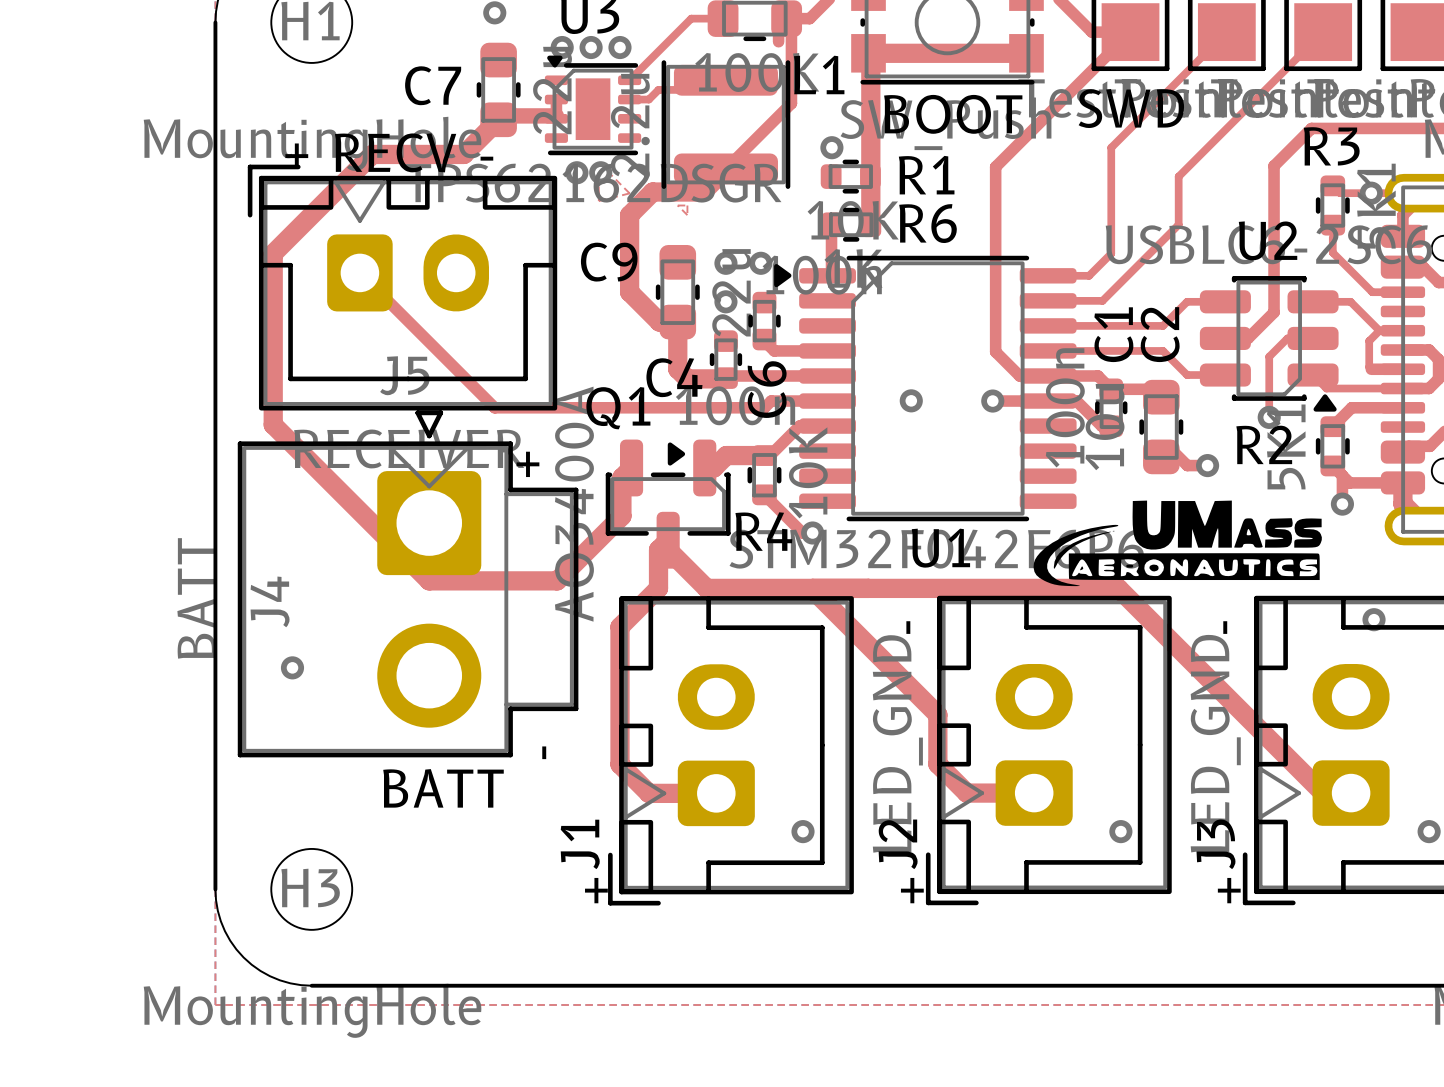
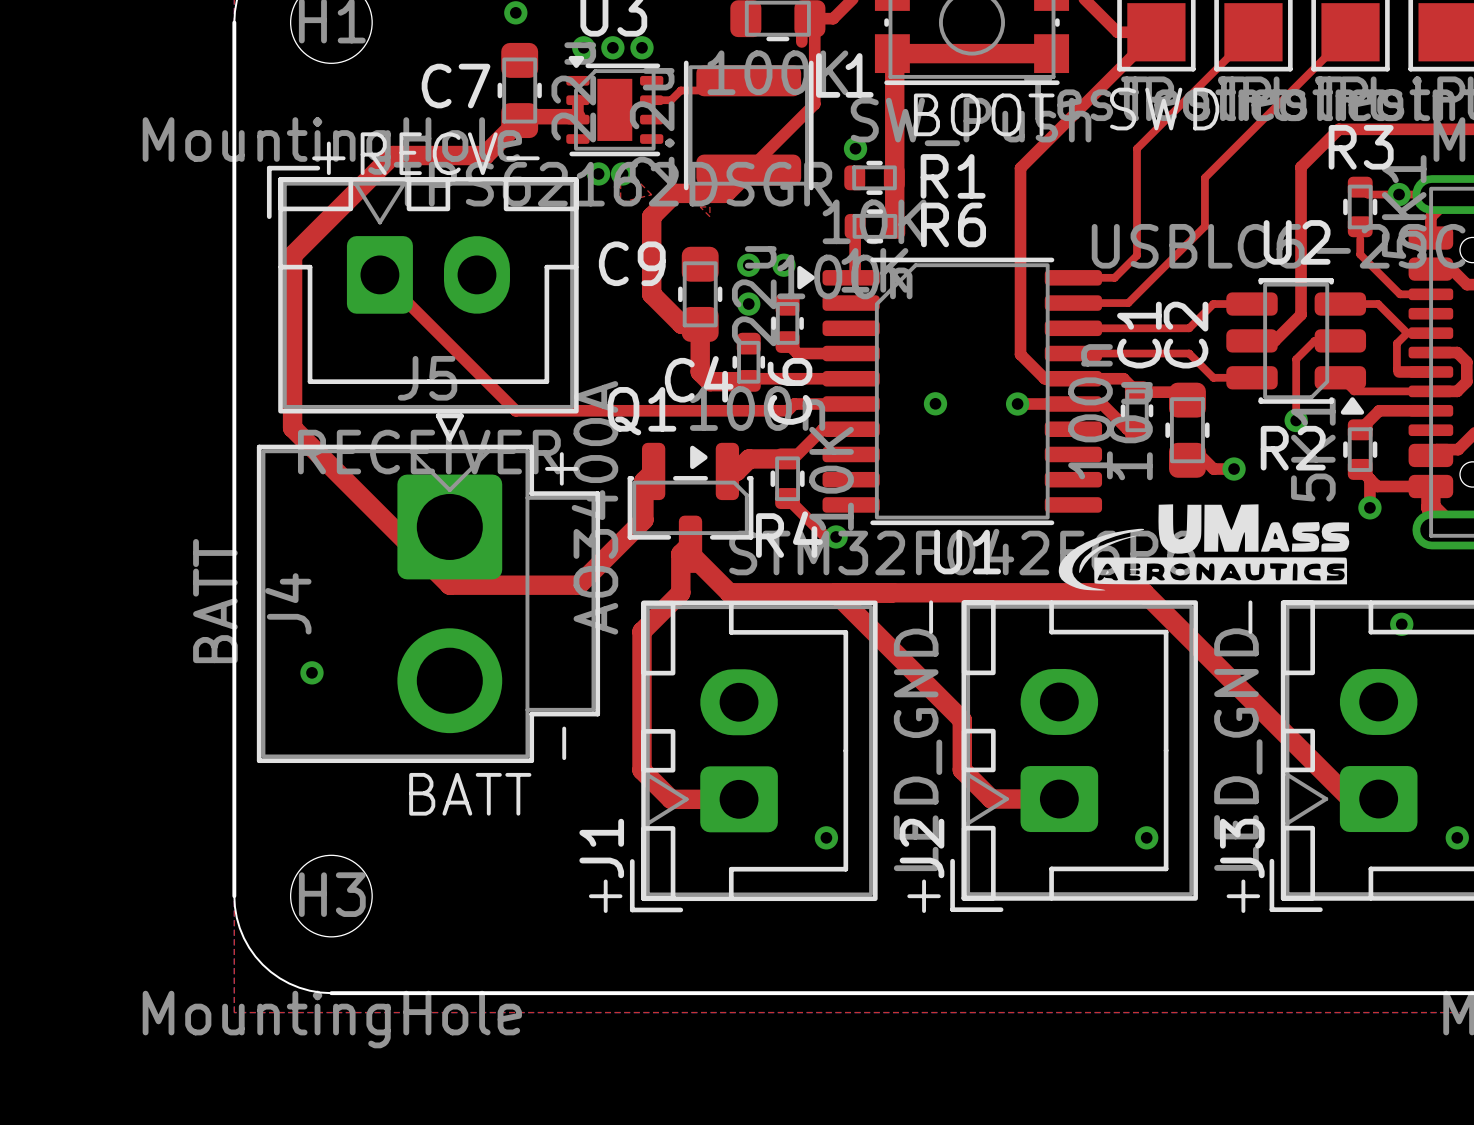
top track: (723, 18) (691, 18) (629, 80) -> none

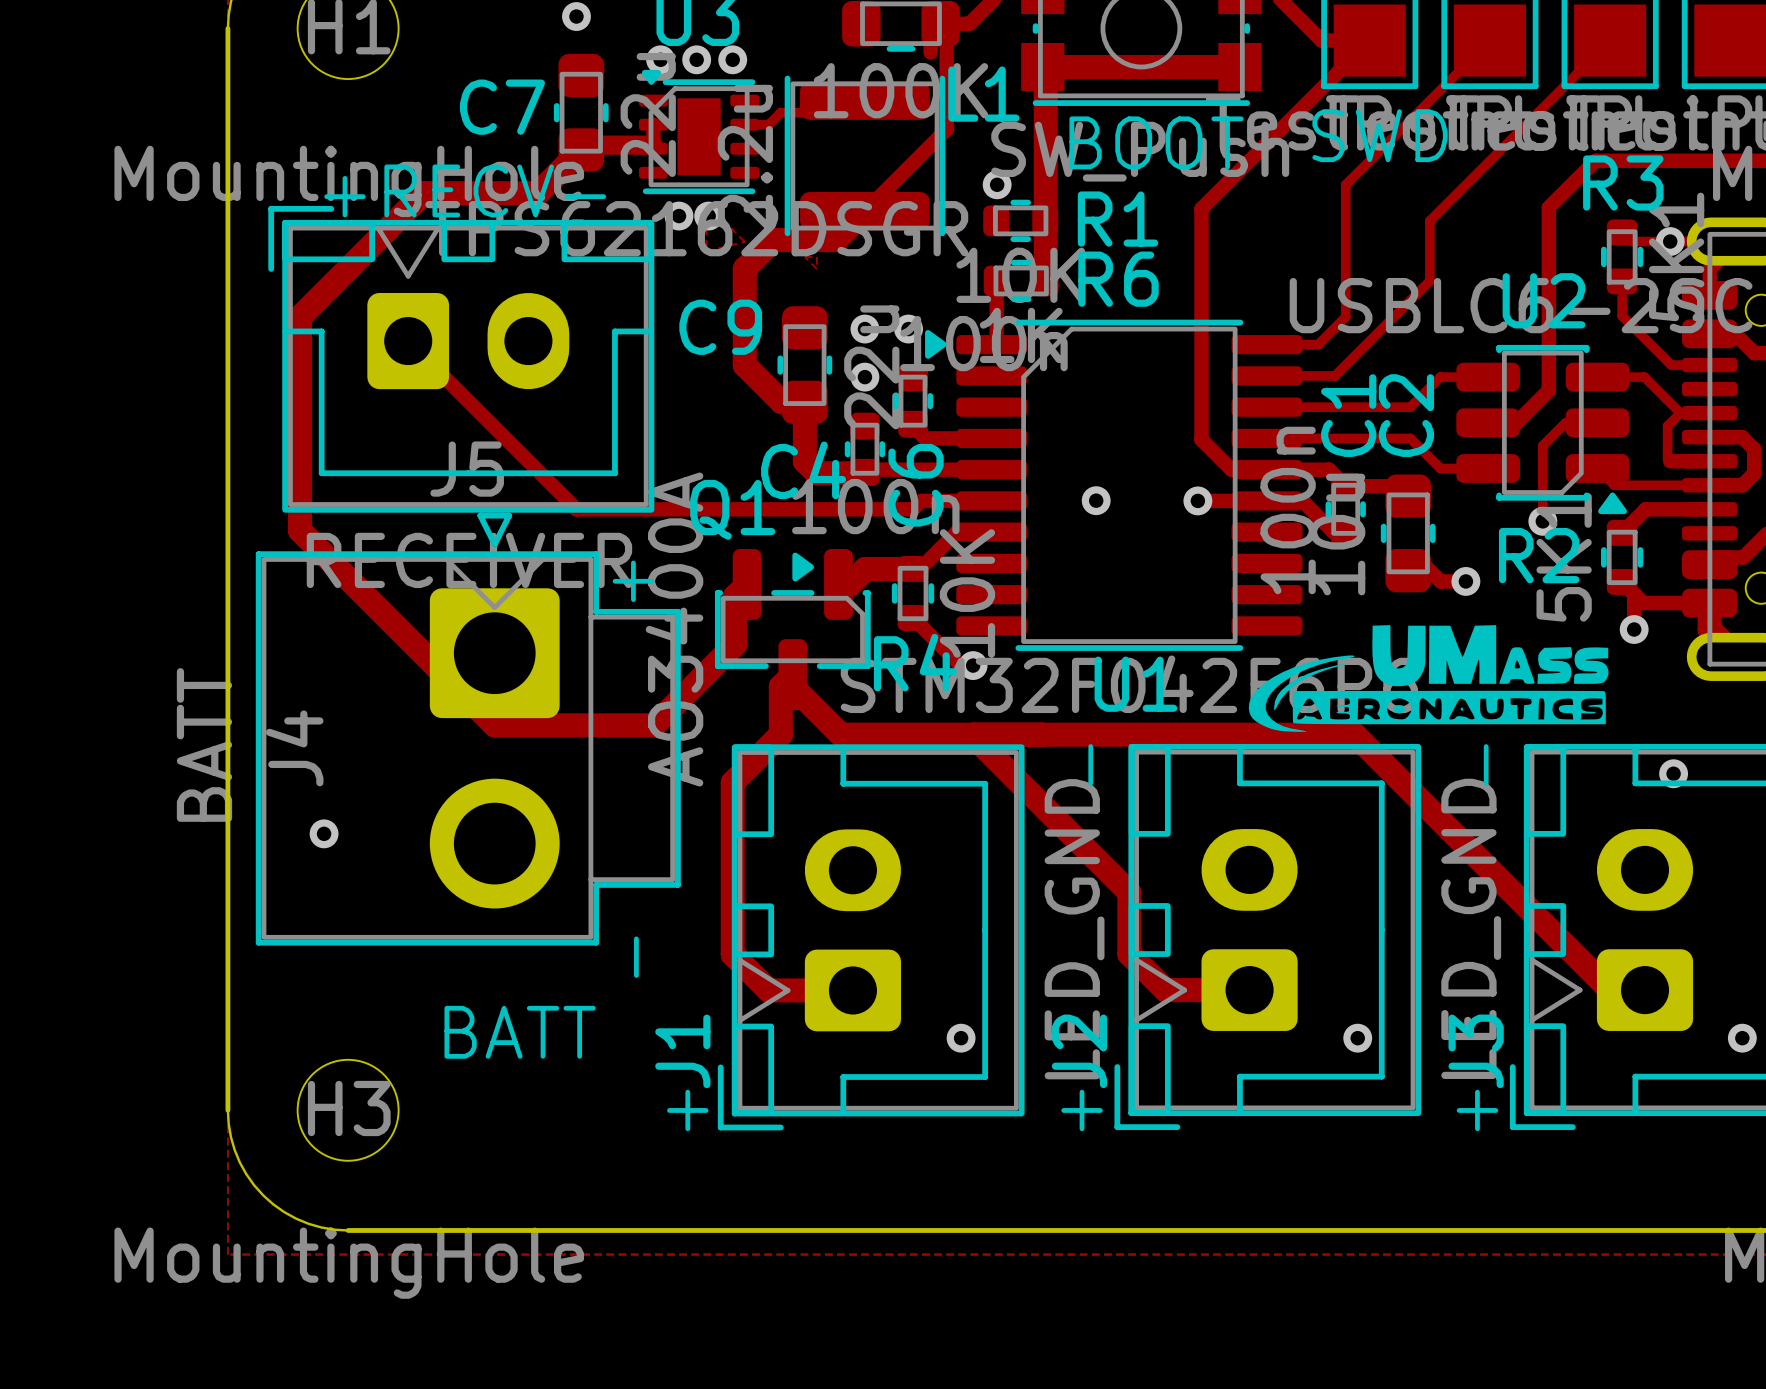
text position: - (564, 743) -> - (636, 957)
text position: BATT (470, 794) -> BATT (520, 1032)

